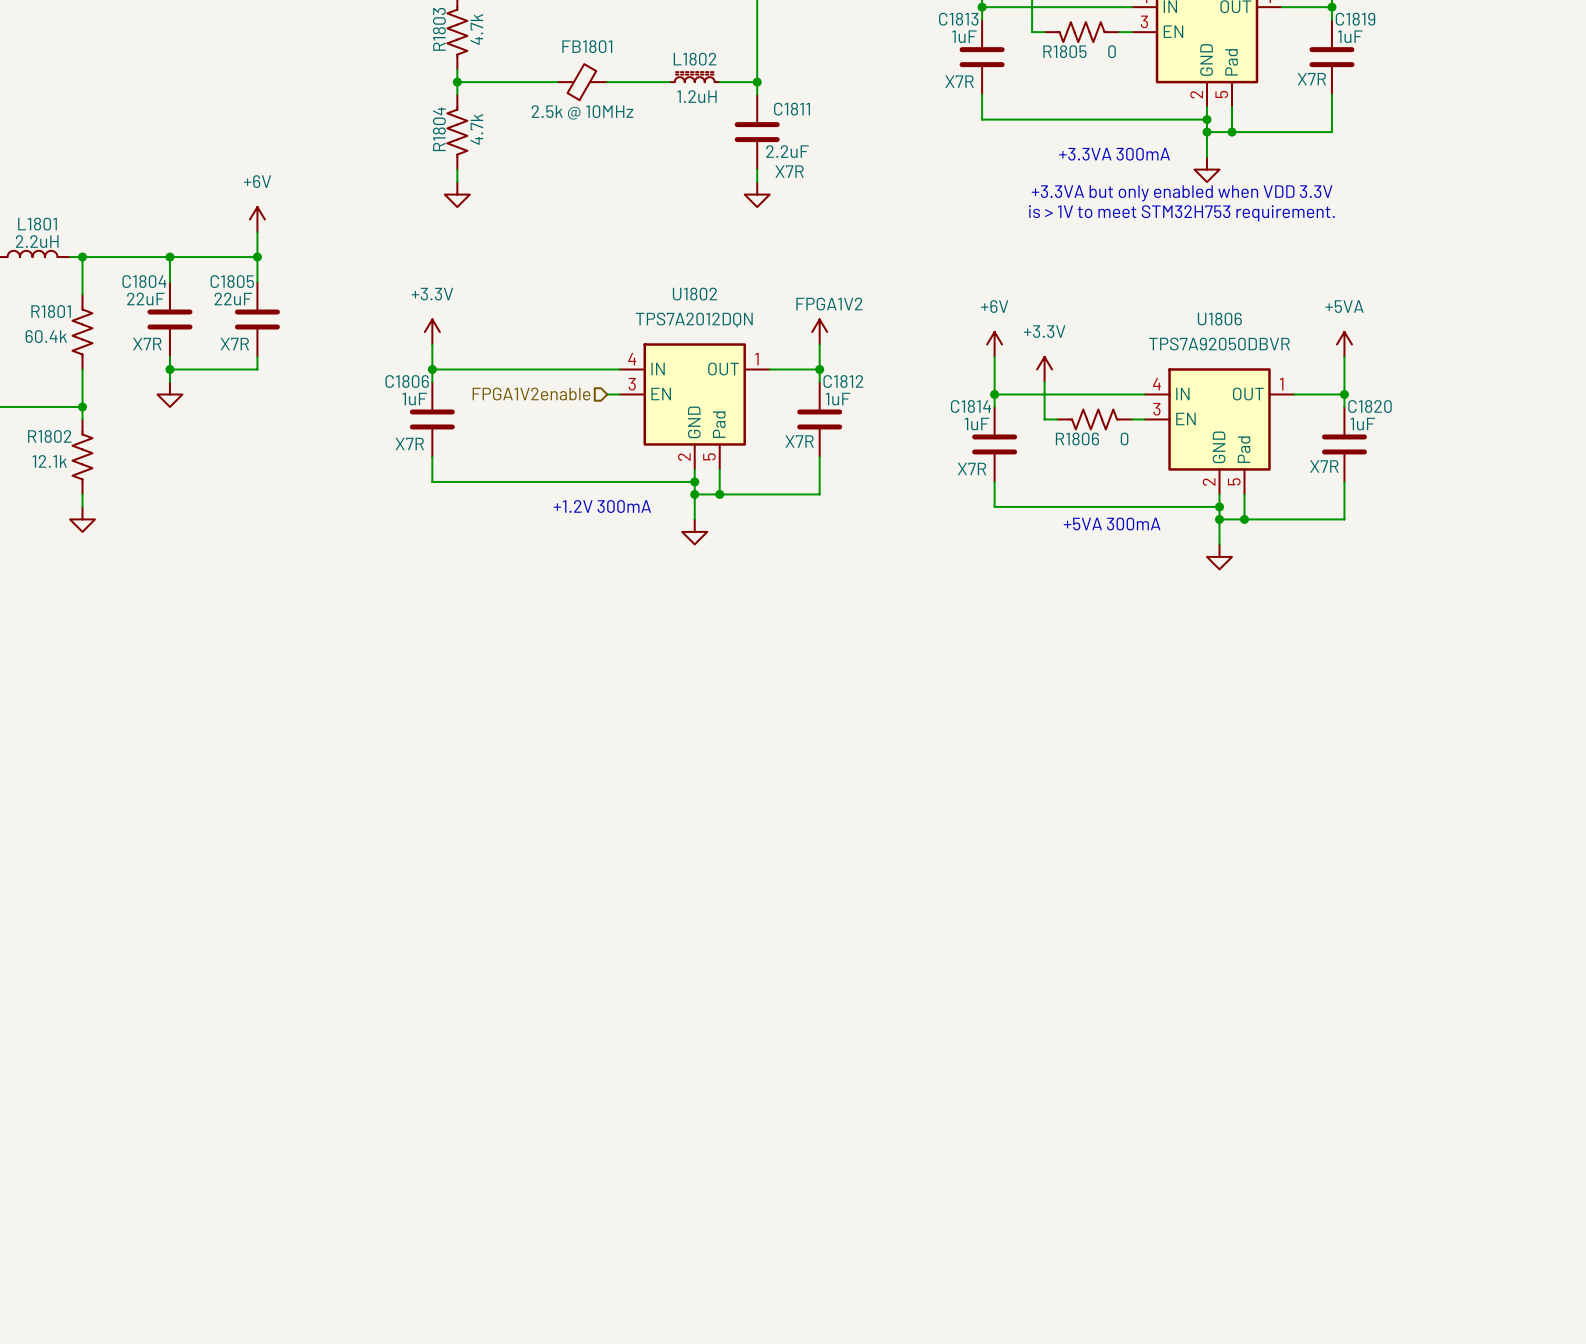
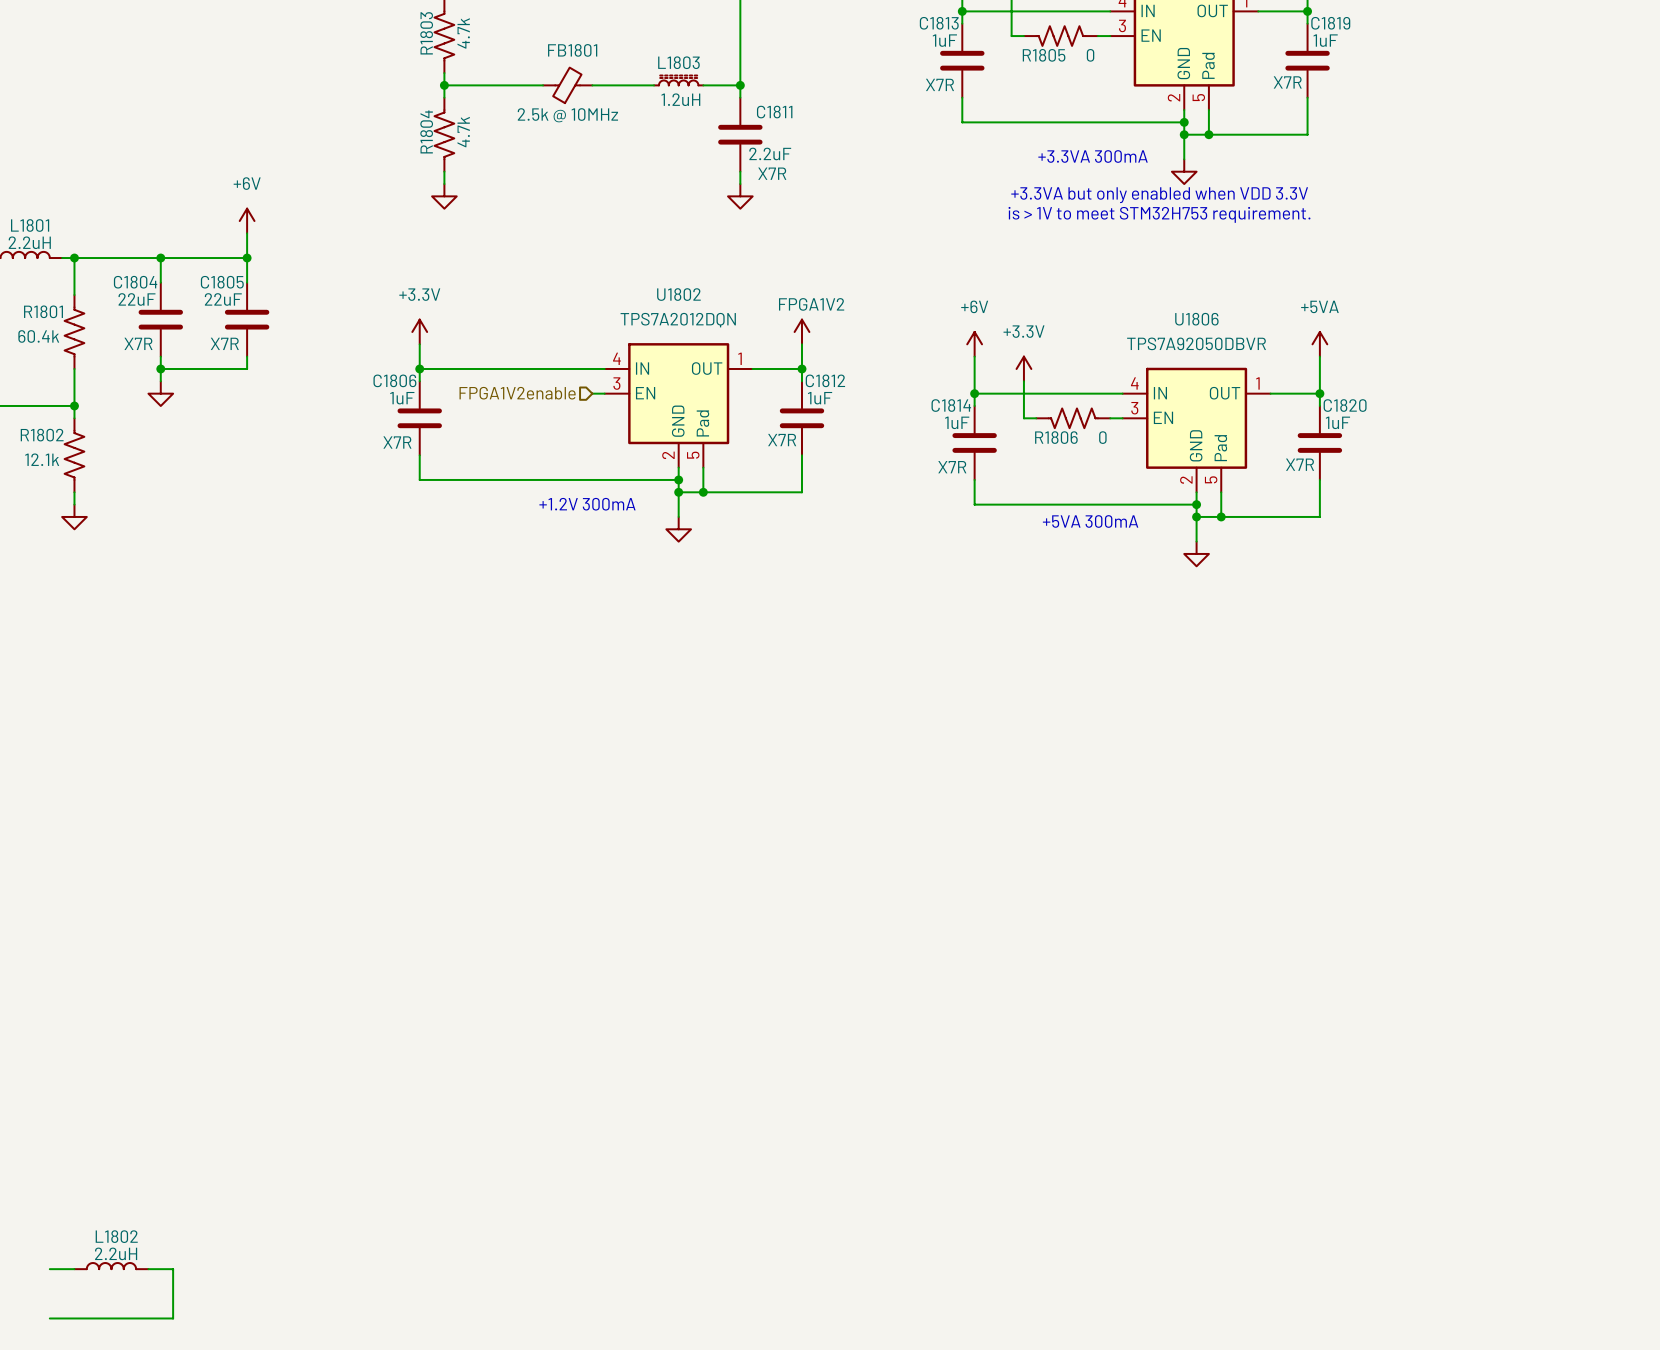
L1802 name: L1802 (695, 59) -> L1803 (678, 62)
L1802: none -> 2.2uH (111, 1266)
wire: none -> (49, 1269) (74, 1269)
wire: none -> (148, 1269) (173, 1269) (173, 1318) (49, 1318)

